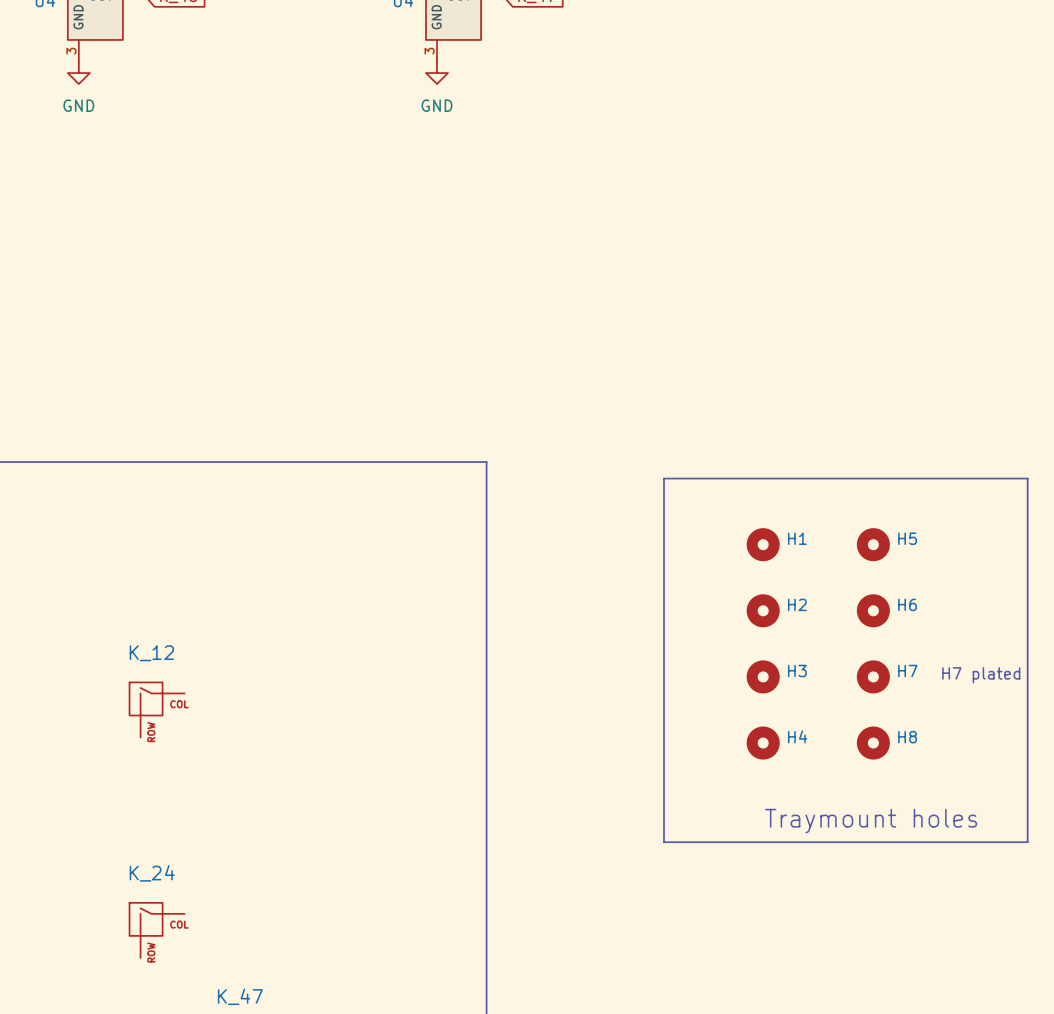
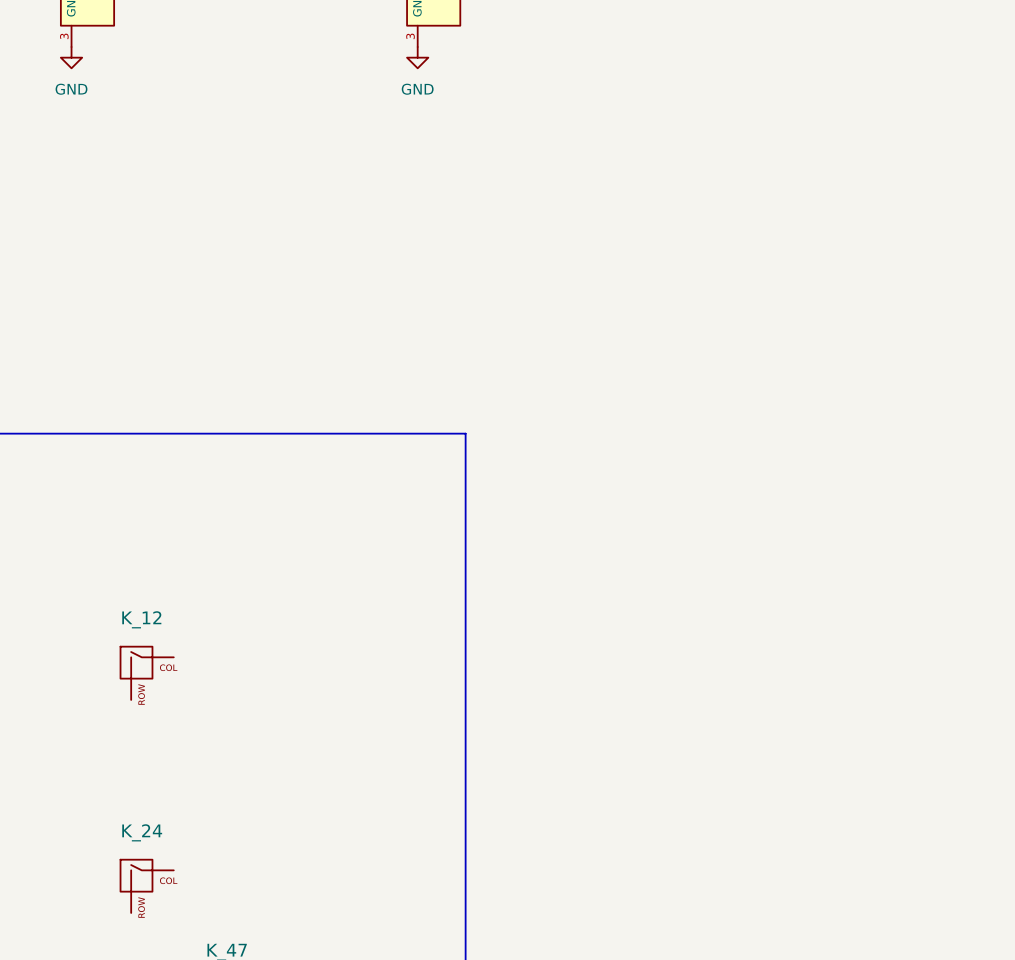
line: (664, 478) (1027, 478) (1027, 842) (664, 842) (664, 478) -> none
H1: (763, 544) -> none
H5: (873, 544) -> none
H2: (763, 610) -> none
H6: (873, 610) -> none
text: H7 plated (981, 675) -> none
H3: (763, 676) -> none
H7: (873, 676) -> none
H4: (763, 743) -> none
H8: (873, 743) -> none
text: Traymount holes (871, 821) -> none

